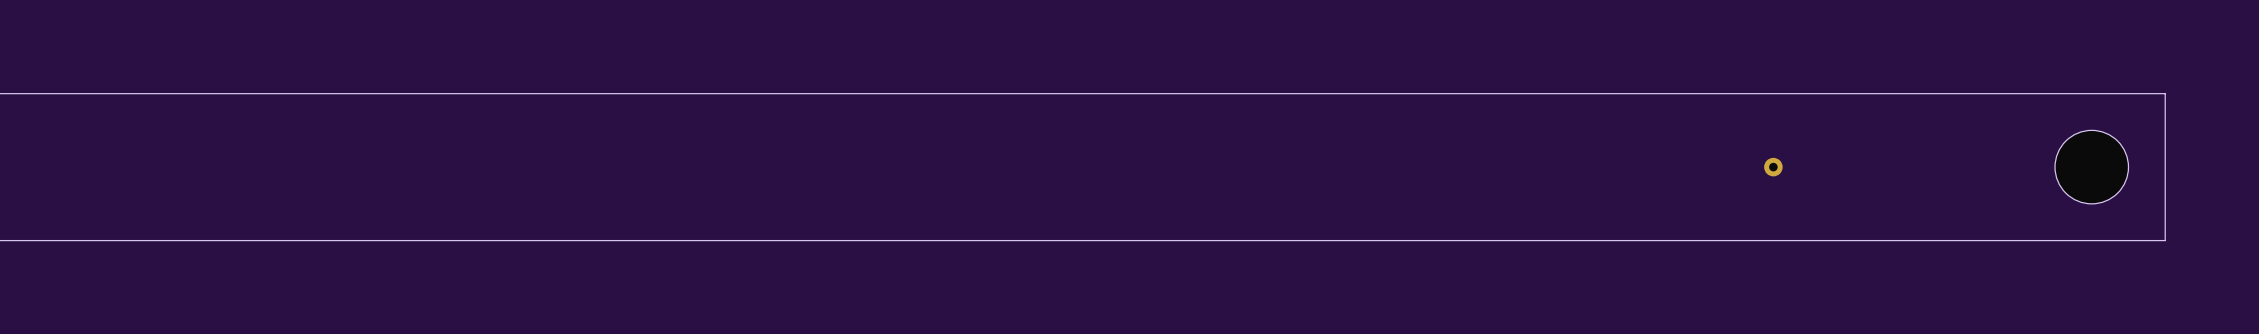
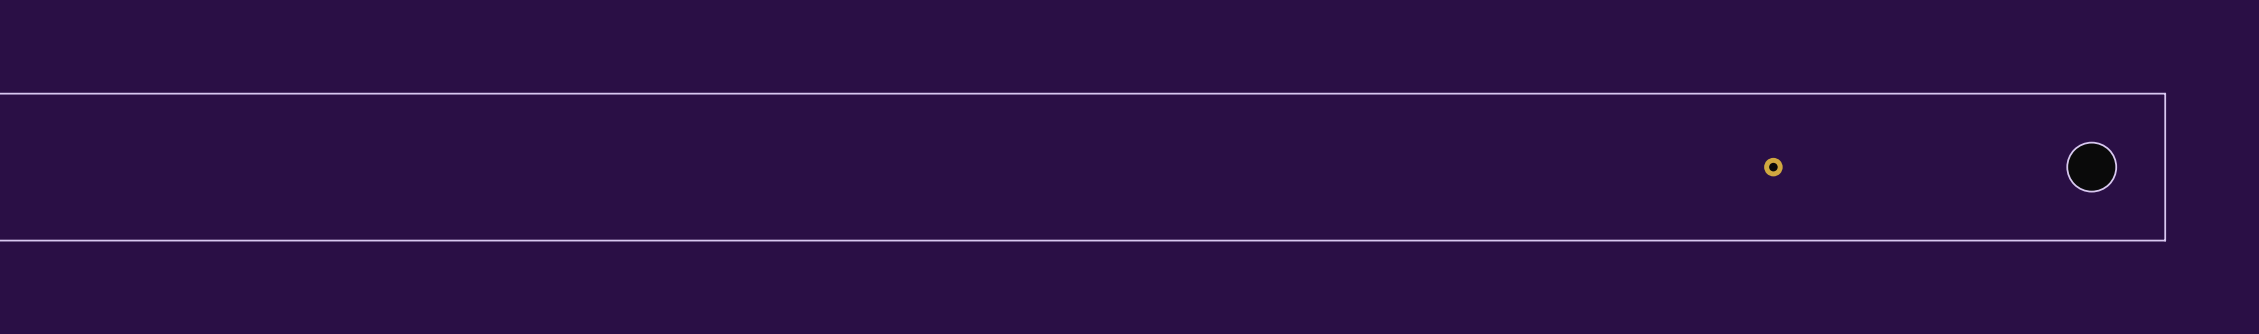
hole size: [2055, 130, 2129, 204] -> [2067, 142, 2117, 192]

